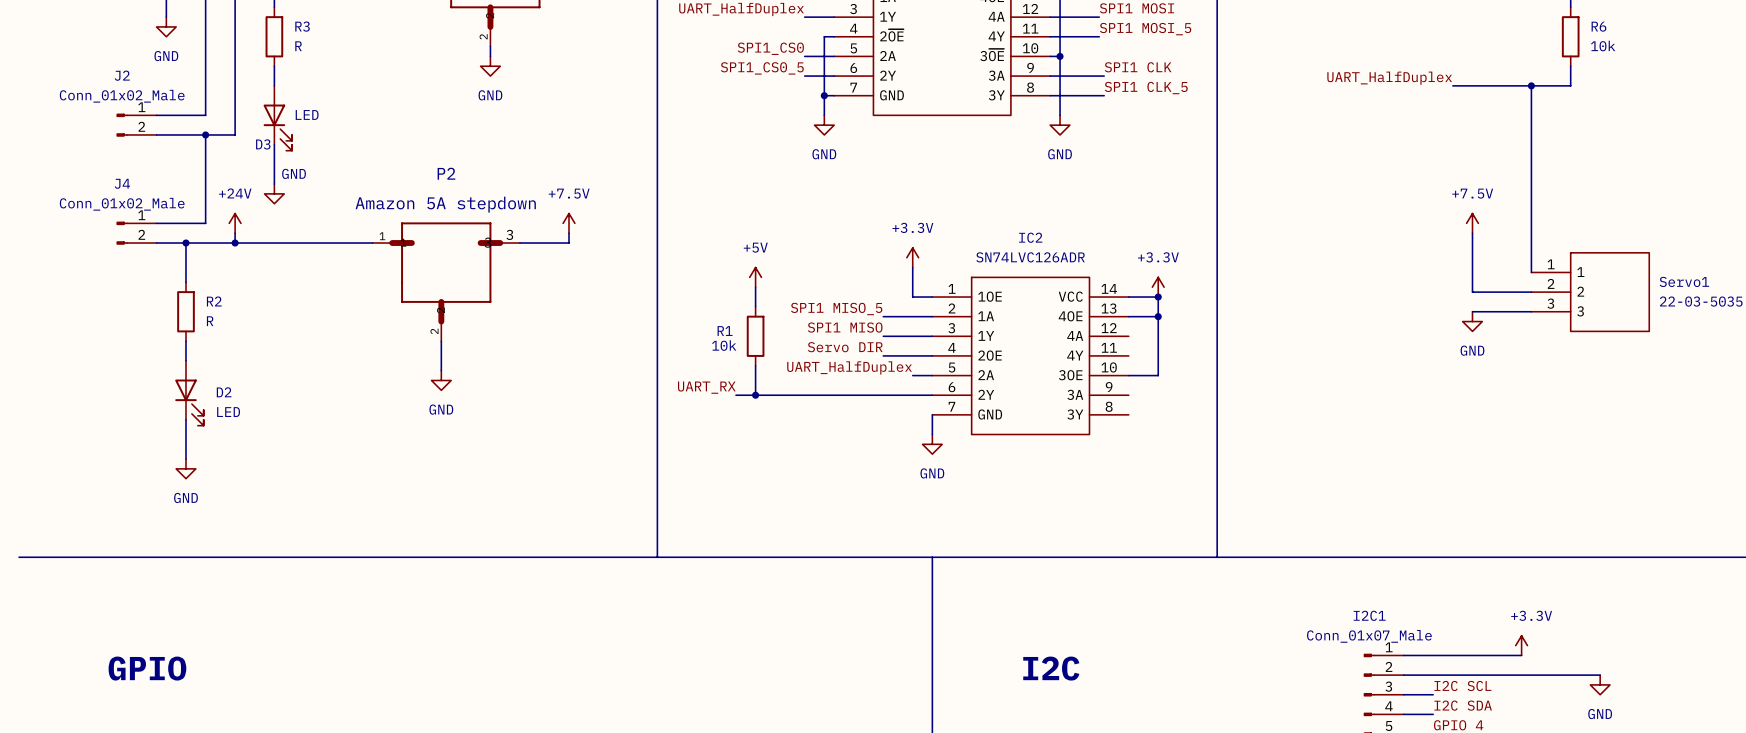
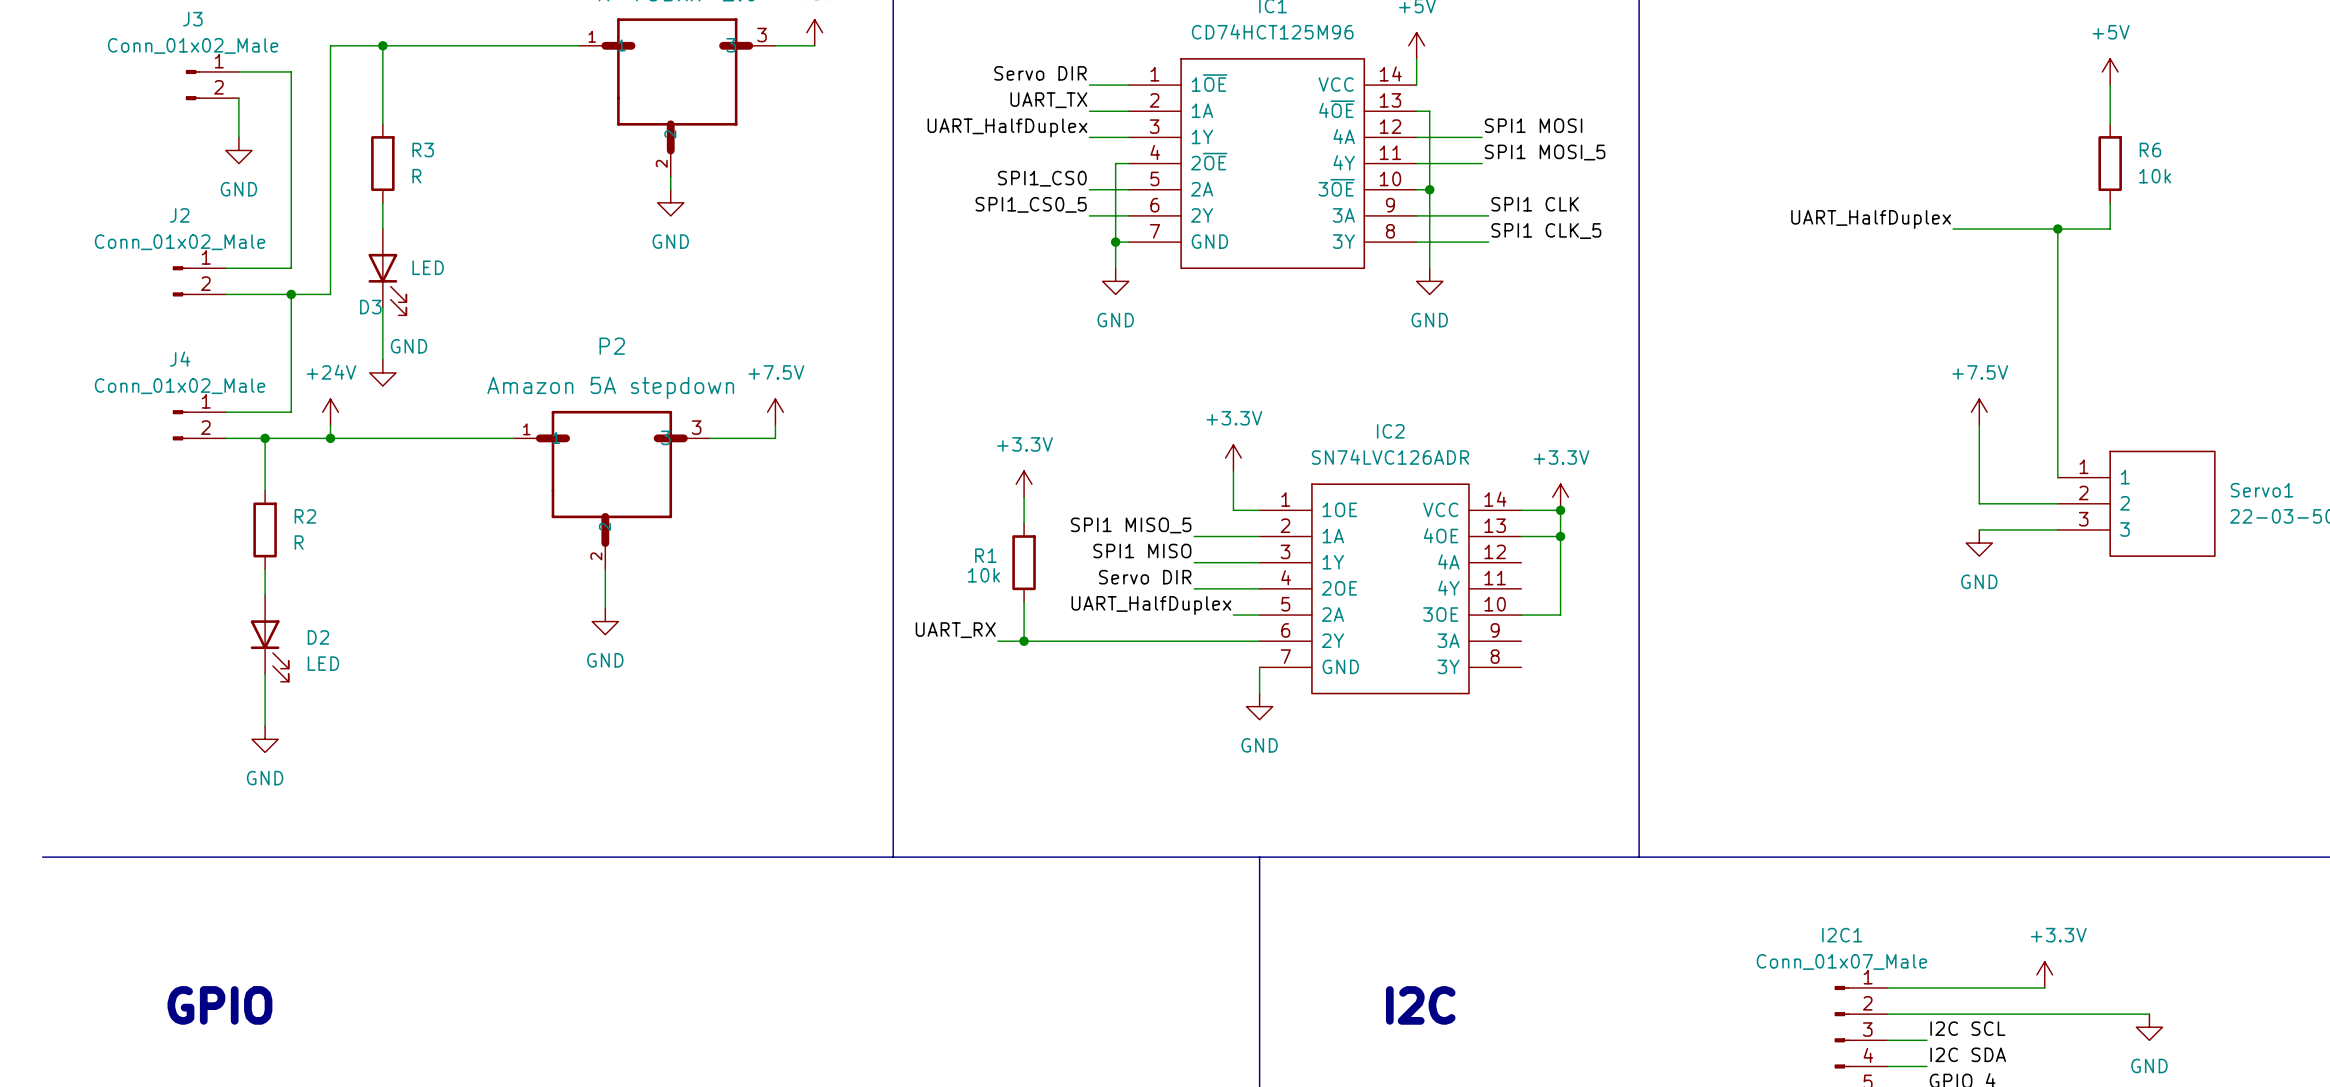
power symbol: +5V (755, 277) -> +3.3V (1024, 484)

